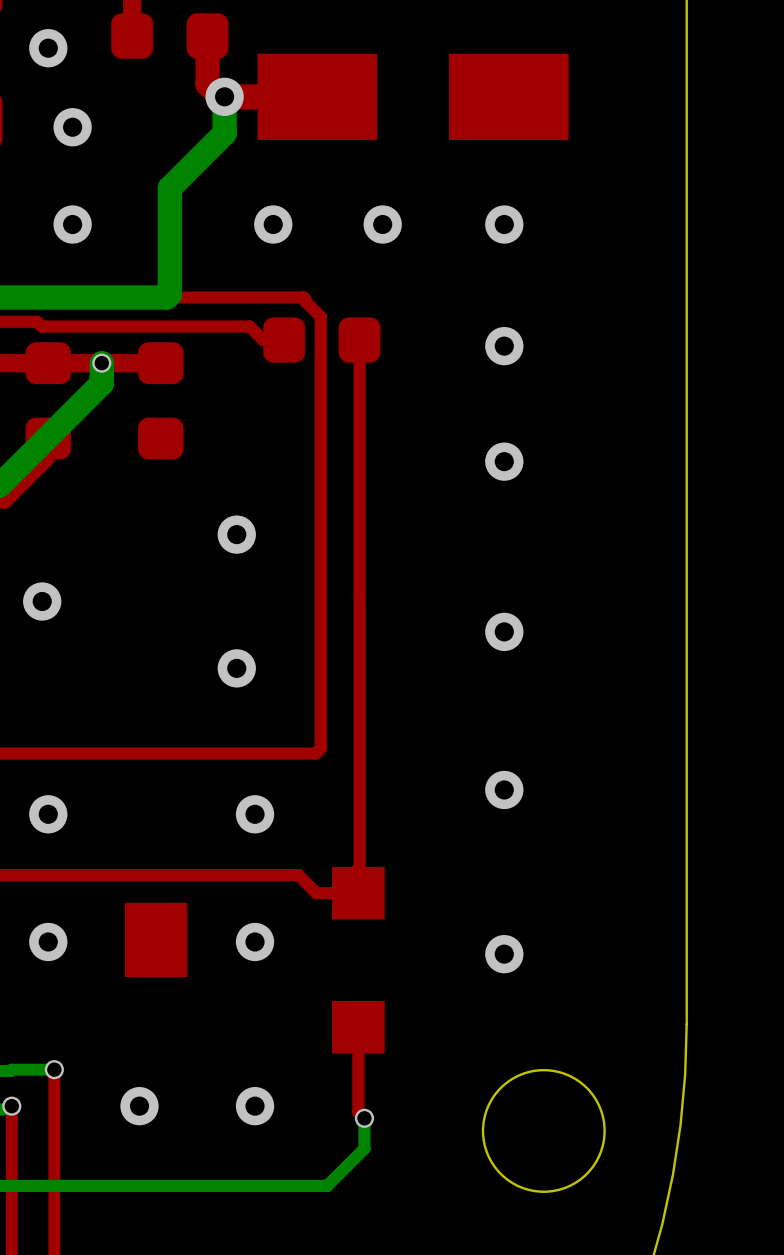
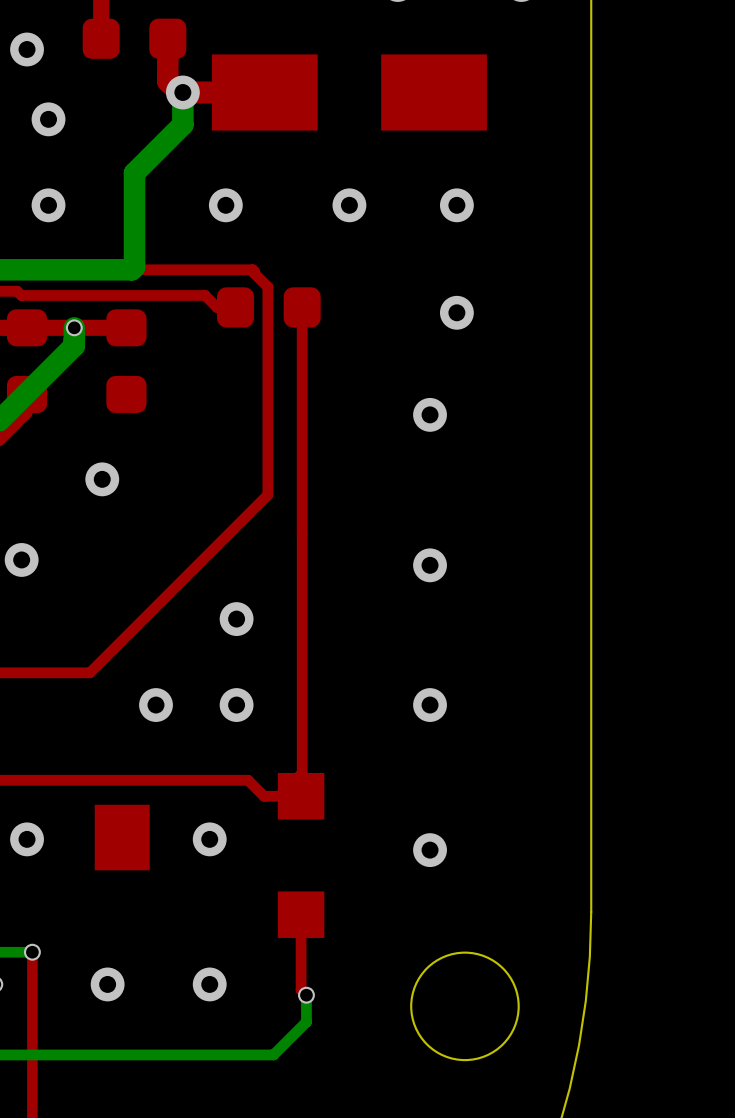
via position: (382, 224) -> (349, 205)
via position: (504, 224) -> (456, 205)
via position: (504, 346) -> (456, 312)
via: none -> (102, 479)
via: (236, 534) -> none
top track: (320, 552) (320, 748) (315, 753) (119, 753) -> (267, 494) (89, 672)
via position: (42, 601) -> (21, 559)
via position: (236, 668) -> (236, 619)
via: none -> (155, 705)
via: (48, 814) -> none
via position: (255, 814) -> (236, 705)

